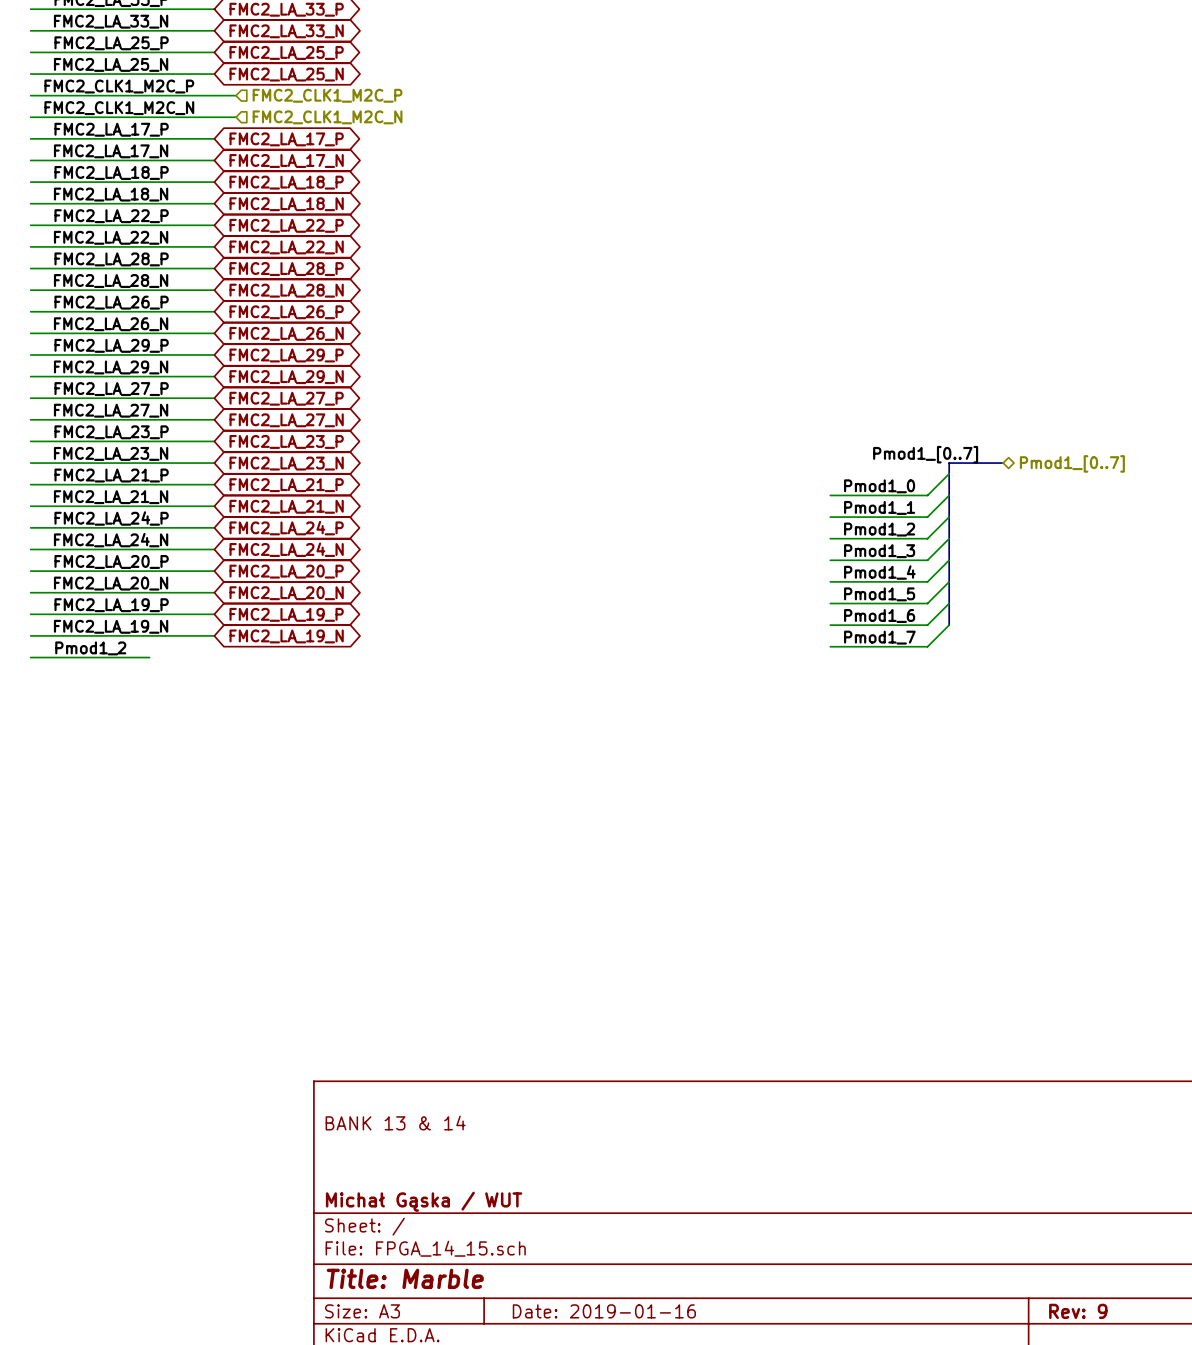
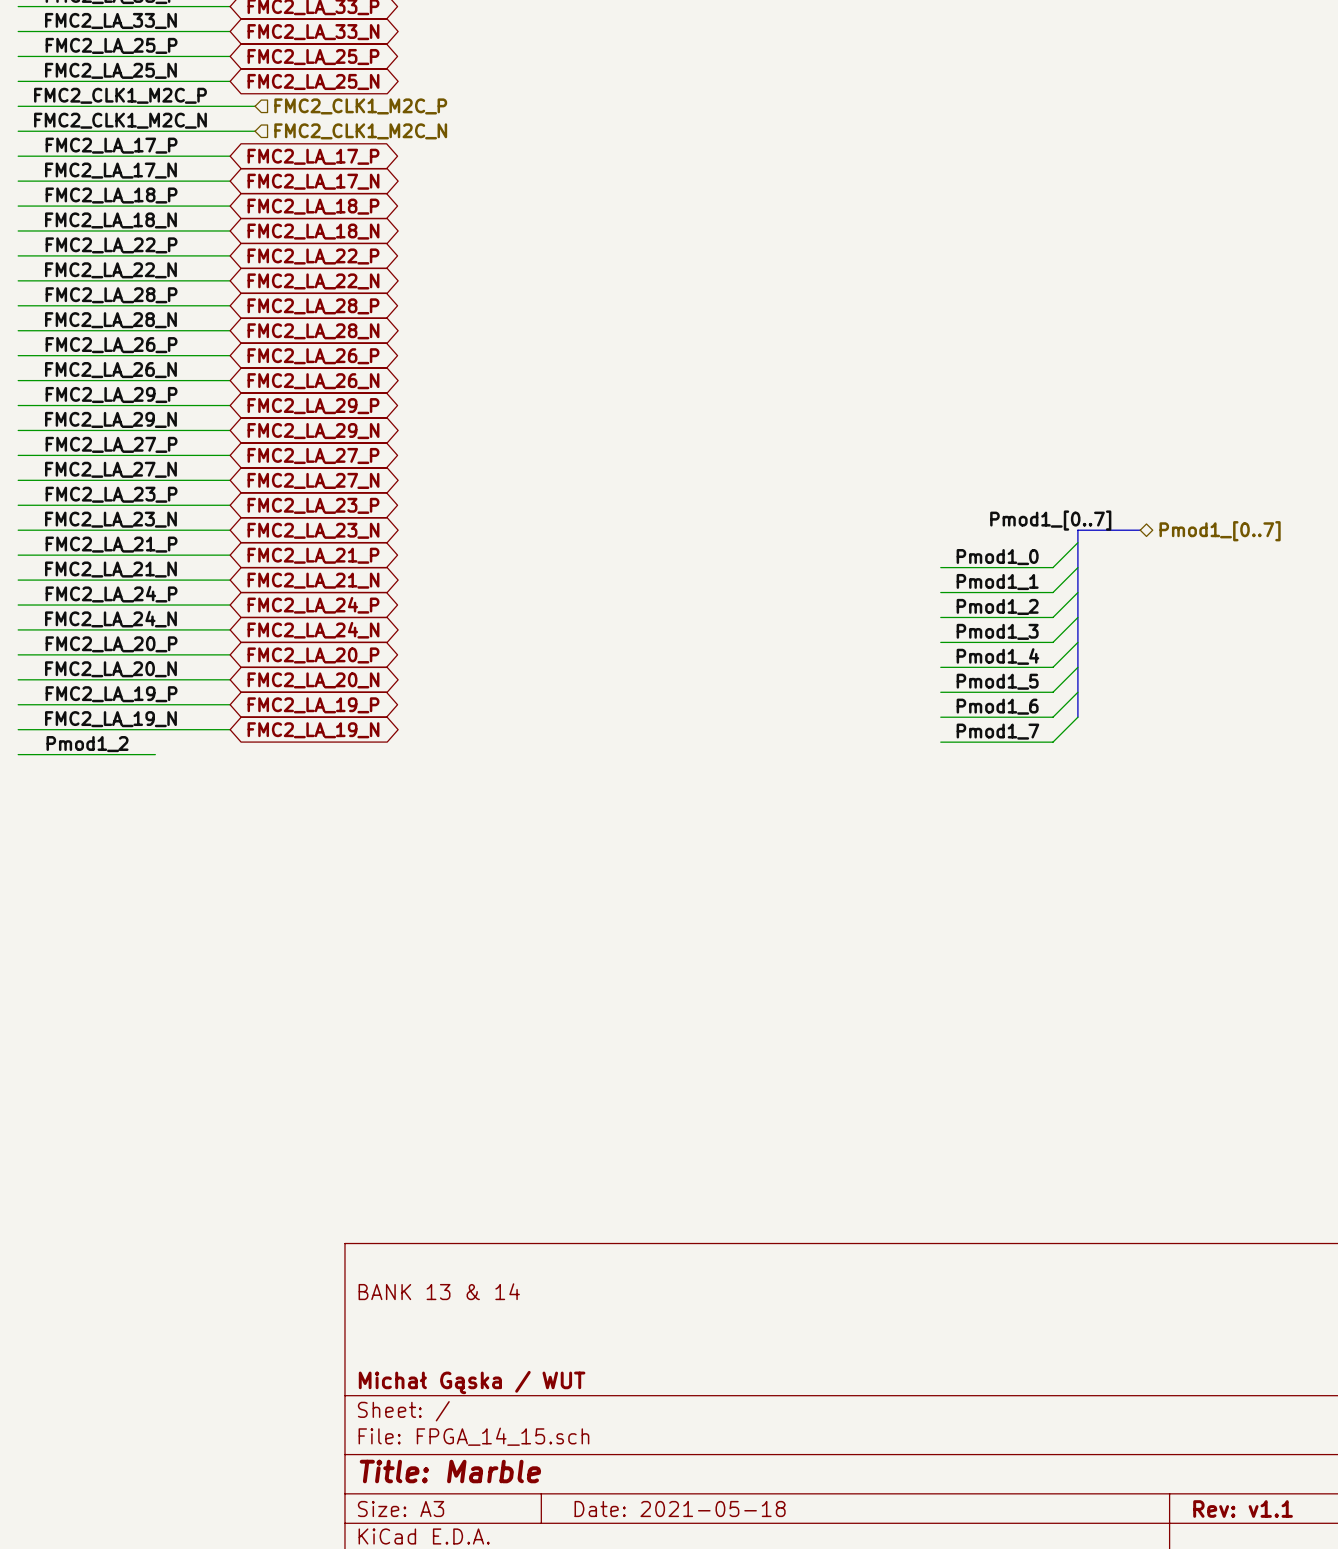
title block: Date: 2019-01-16 (604, 1311) -> Date: 2021-05-18 (680, 1509)
title block: Rev: 9 (1078, 1311) -> Rev: v1.1 (1243, 1509)

